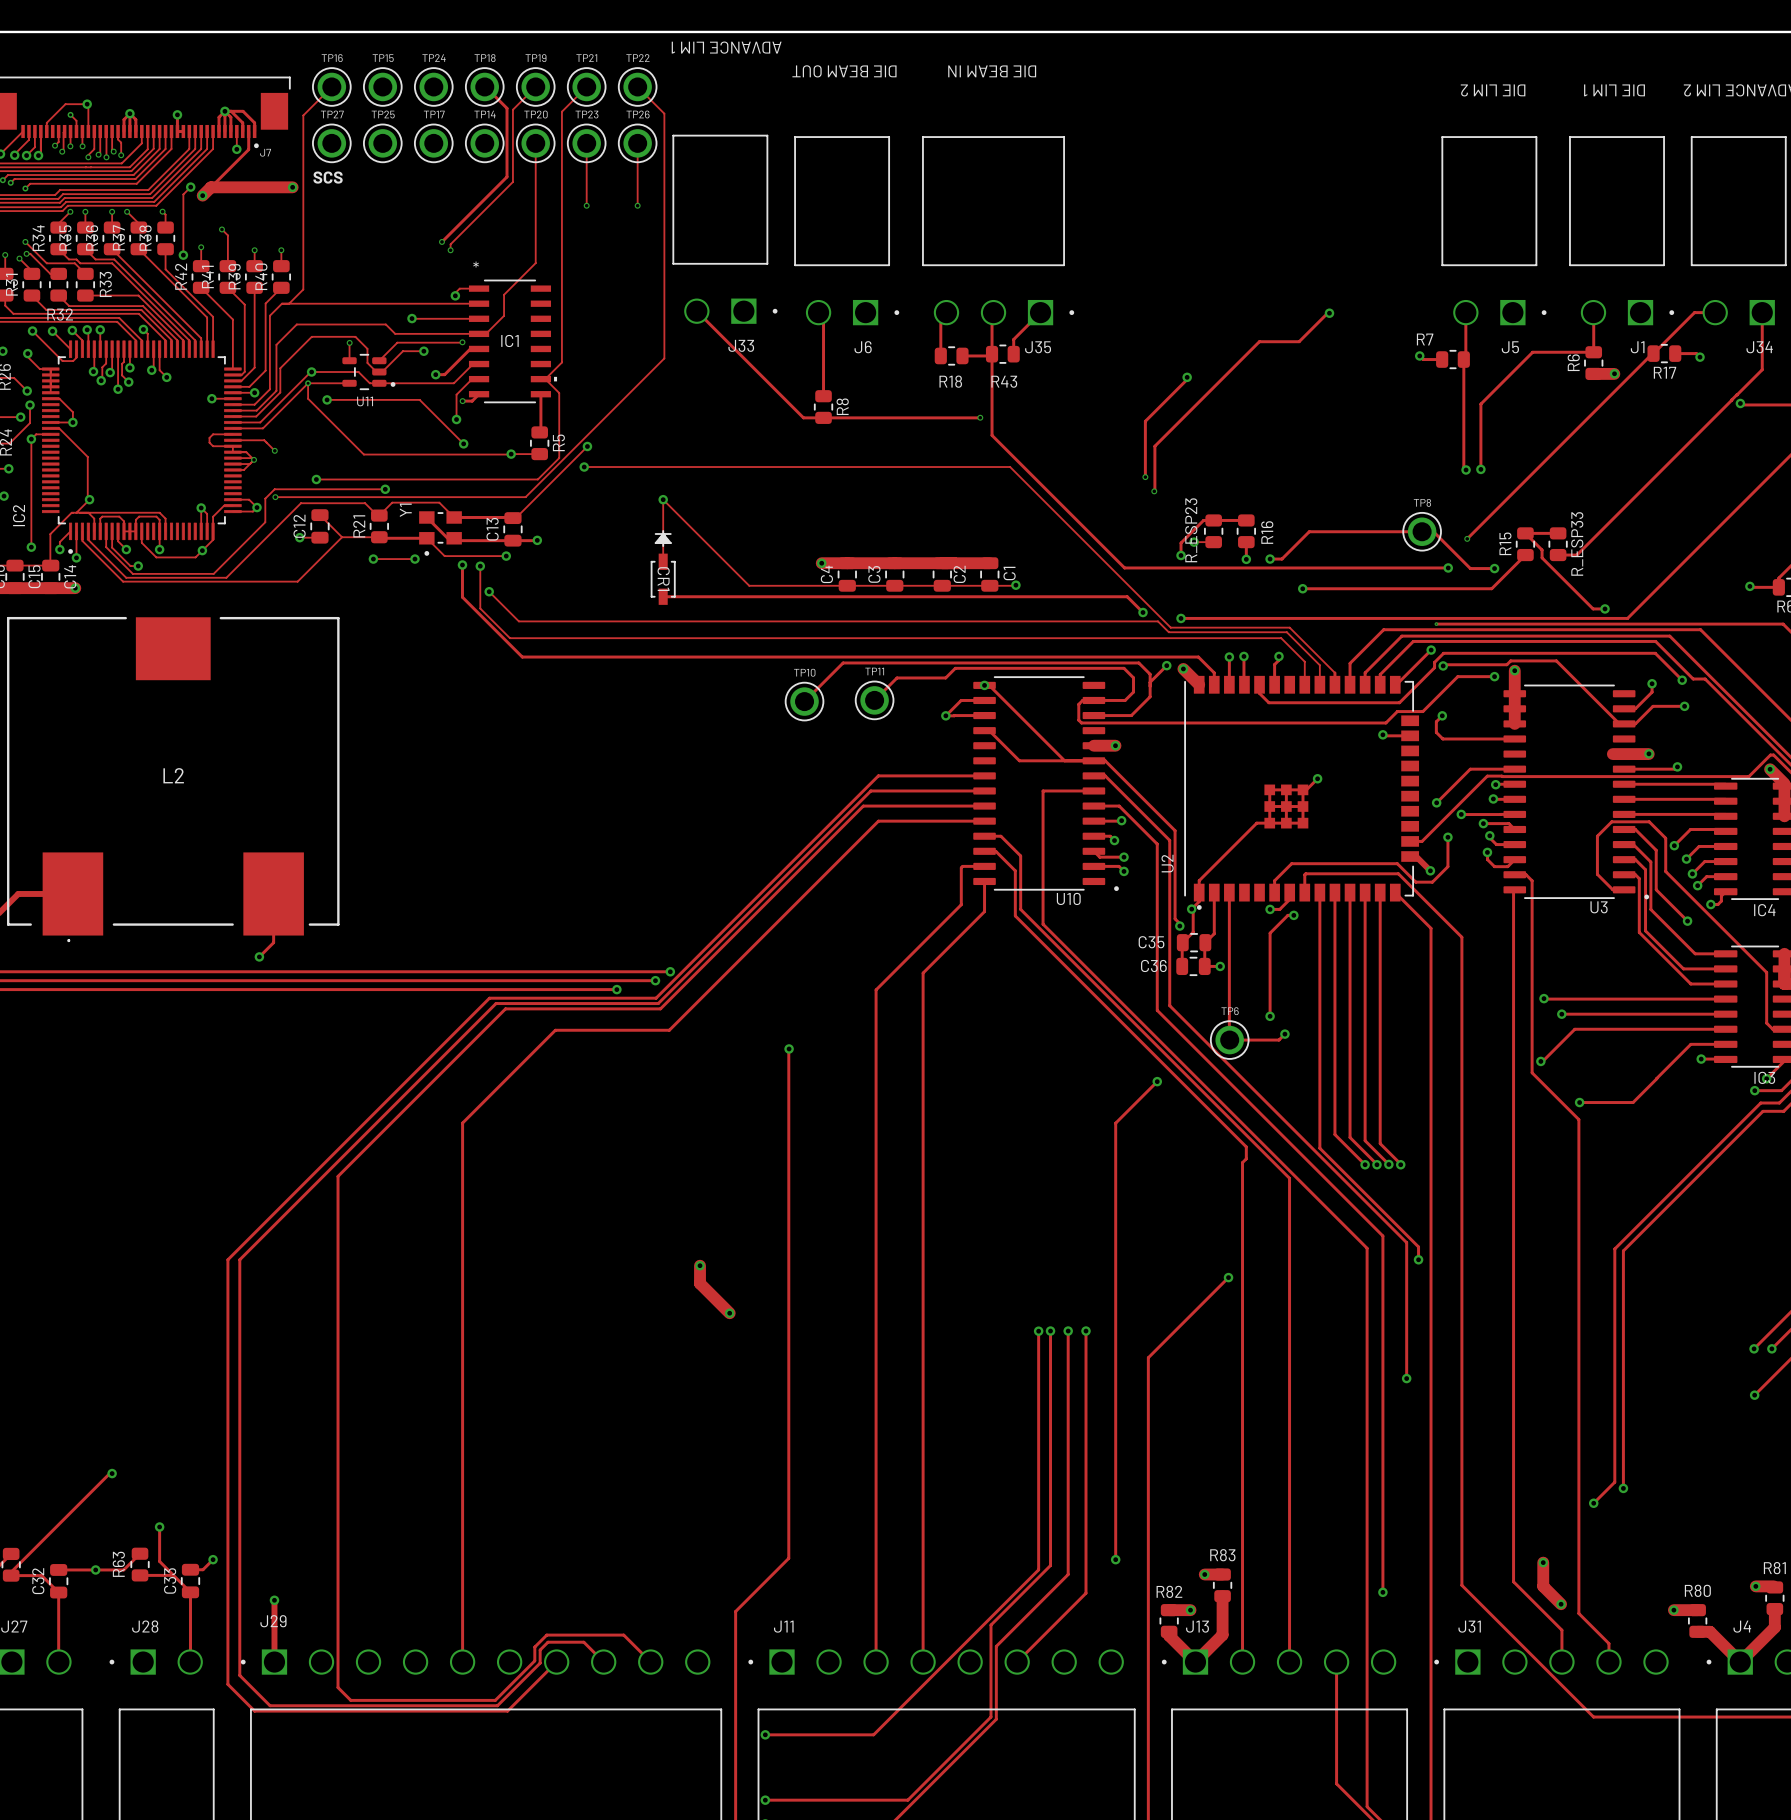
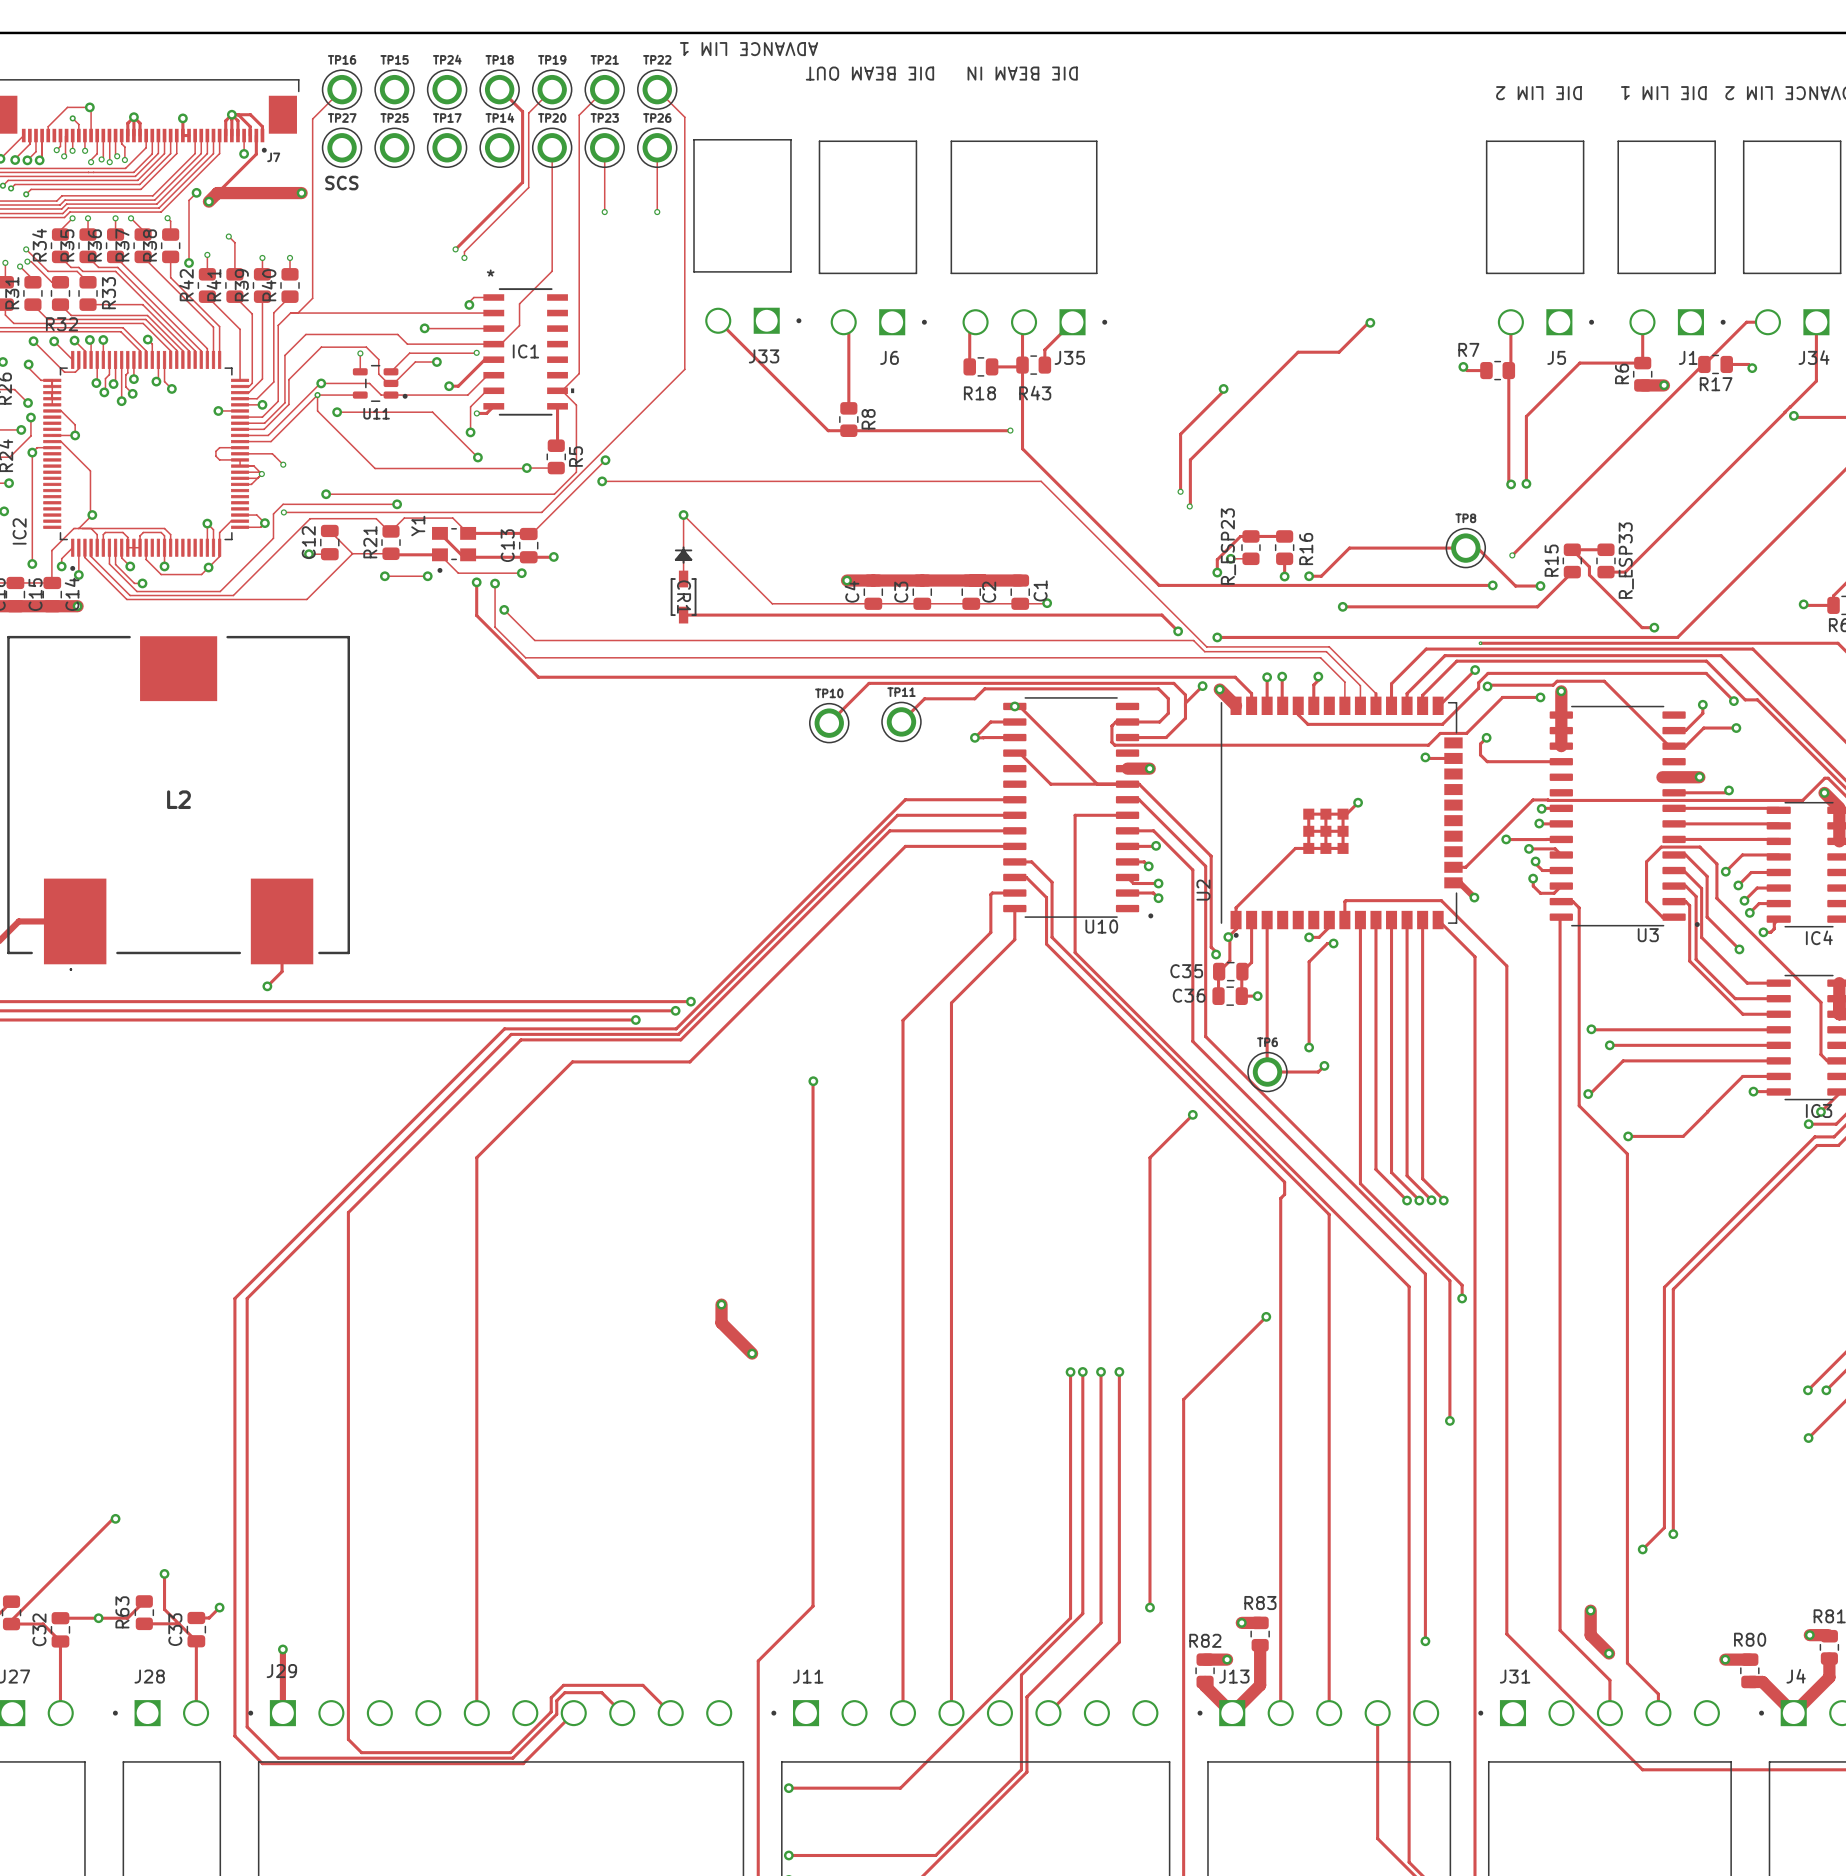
track: (1514, 769) (1470, 769) (1436, 802) -> none
via: (1436, 802) -> none
track: (1447, 837) (1447, 866) (1432, 882) (1415, 882) (1397, 863) (1291, 863) (1274, 880) (1274, 892) -> none
via: (1447, 837) -> none

